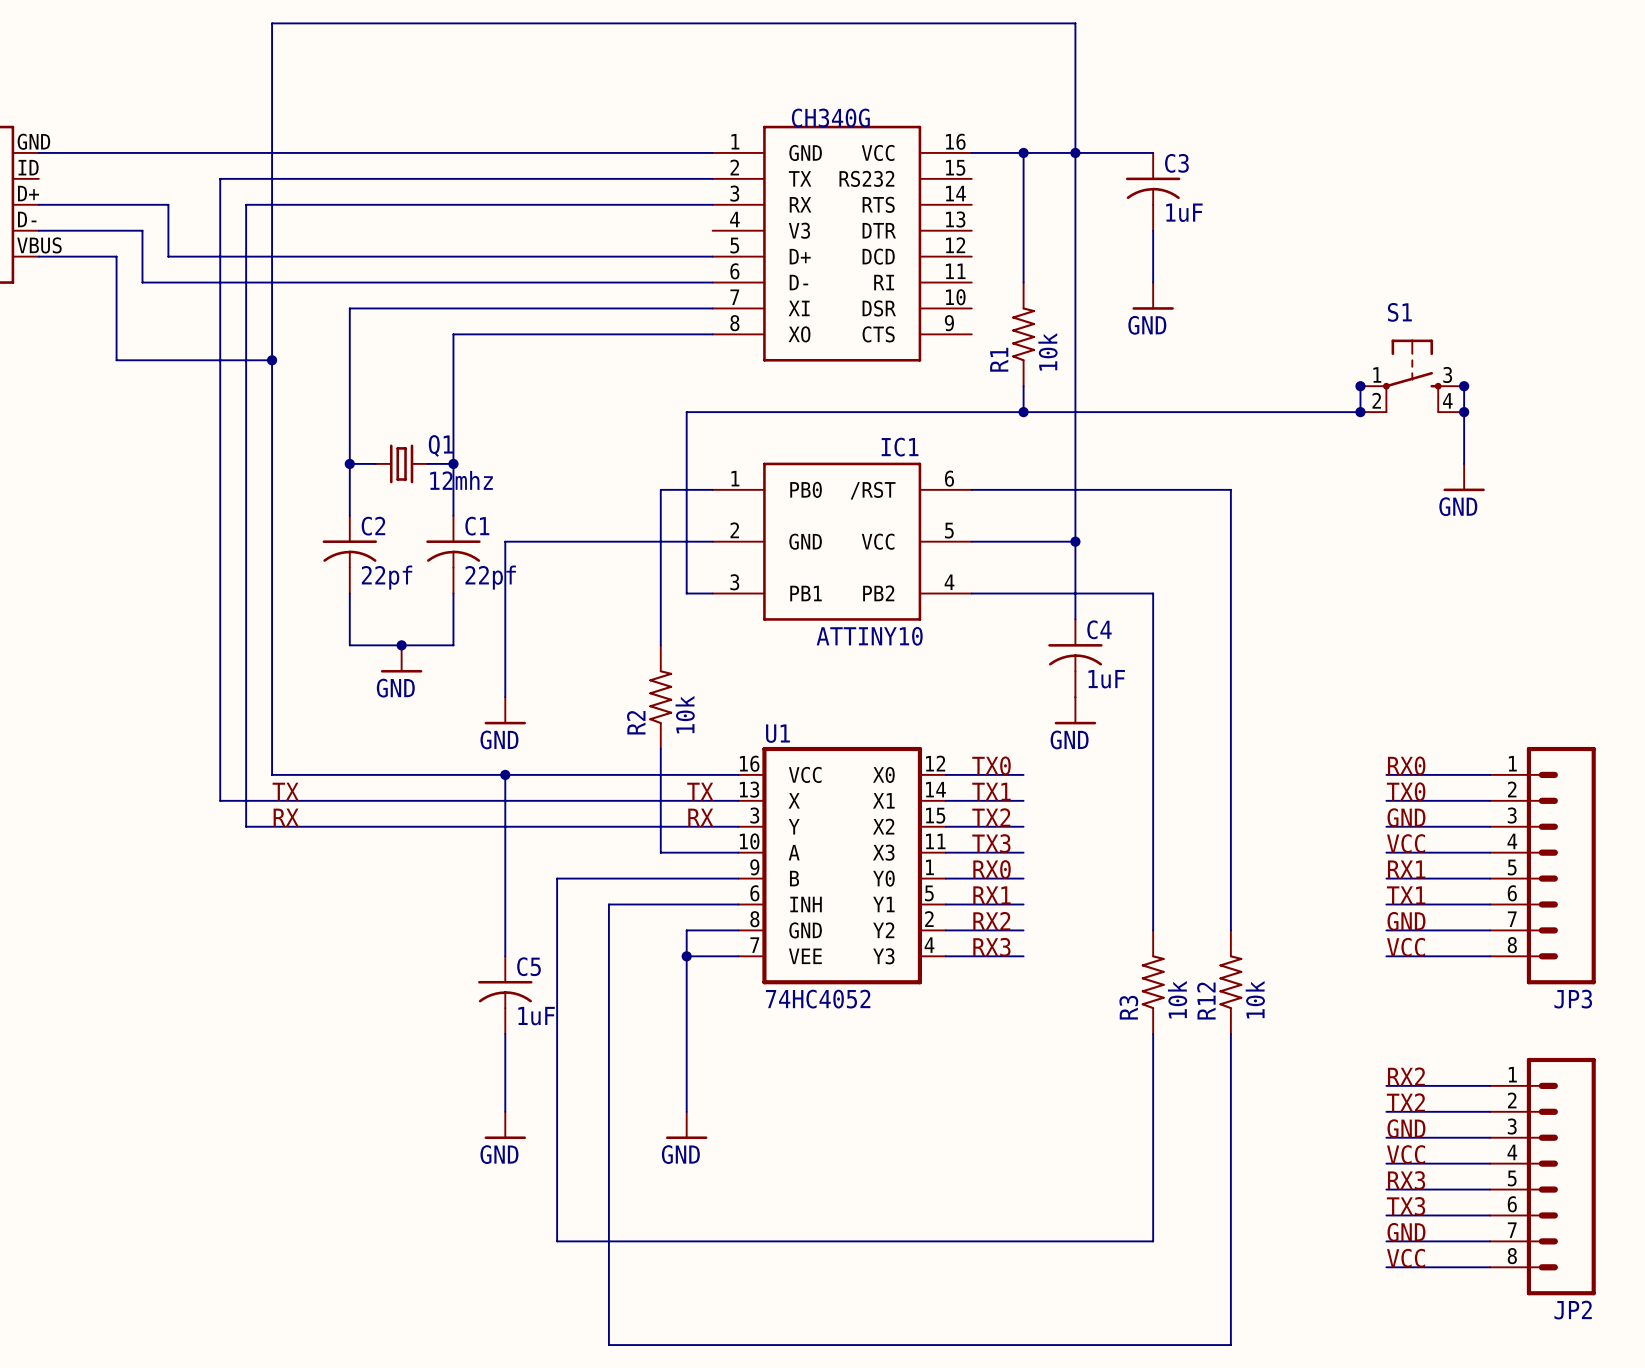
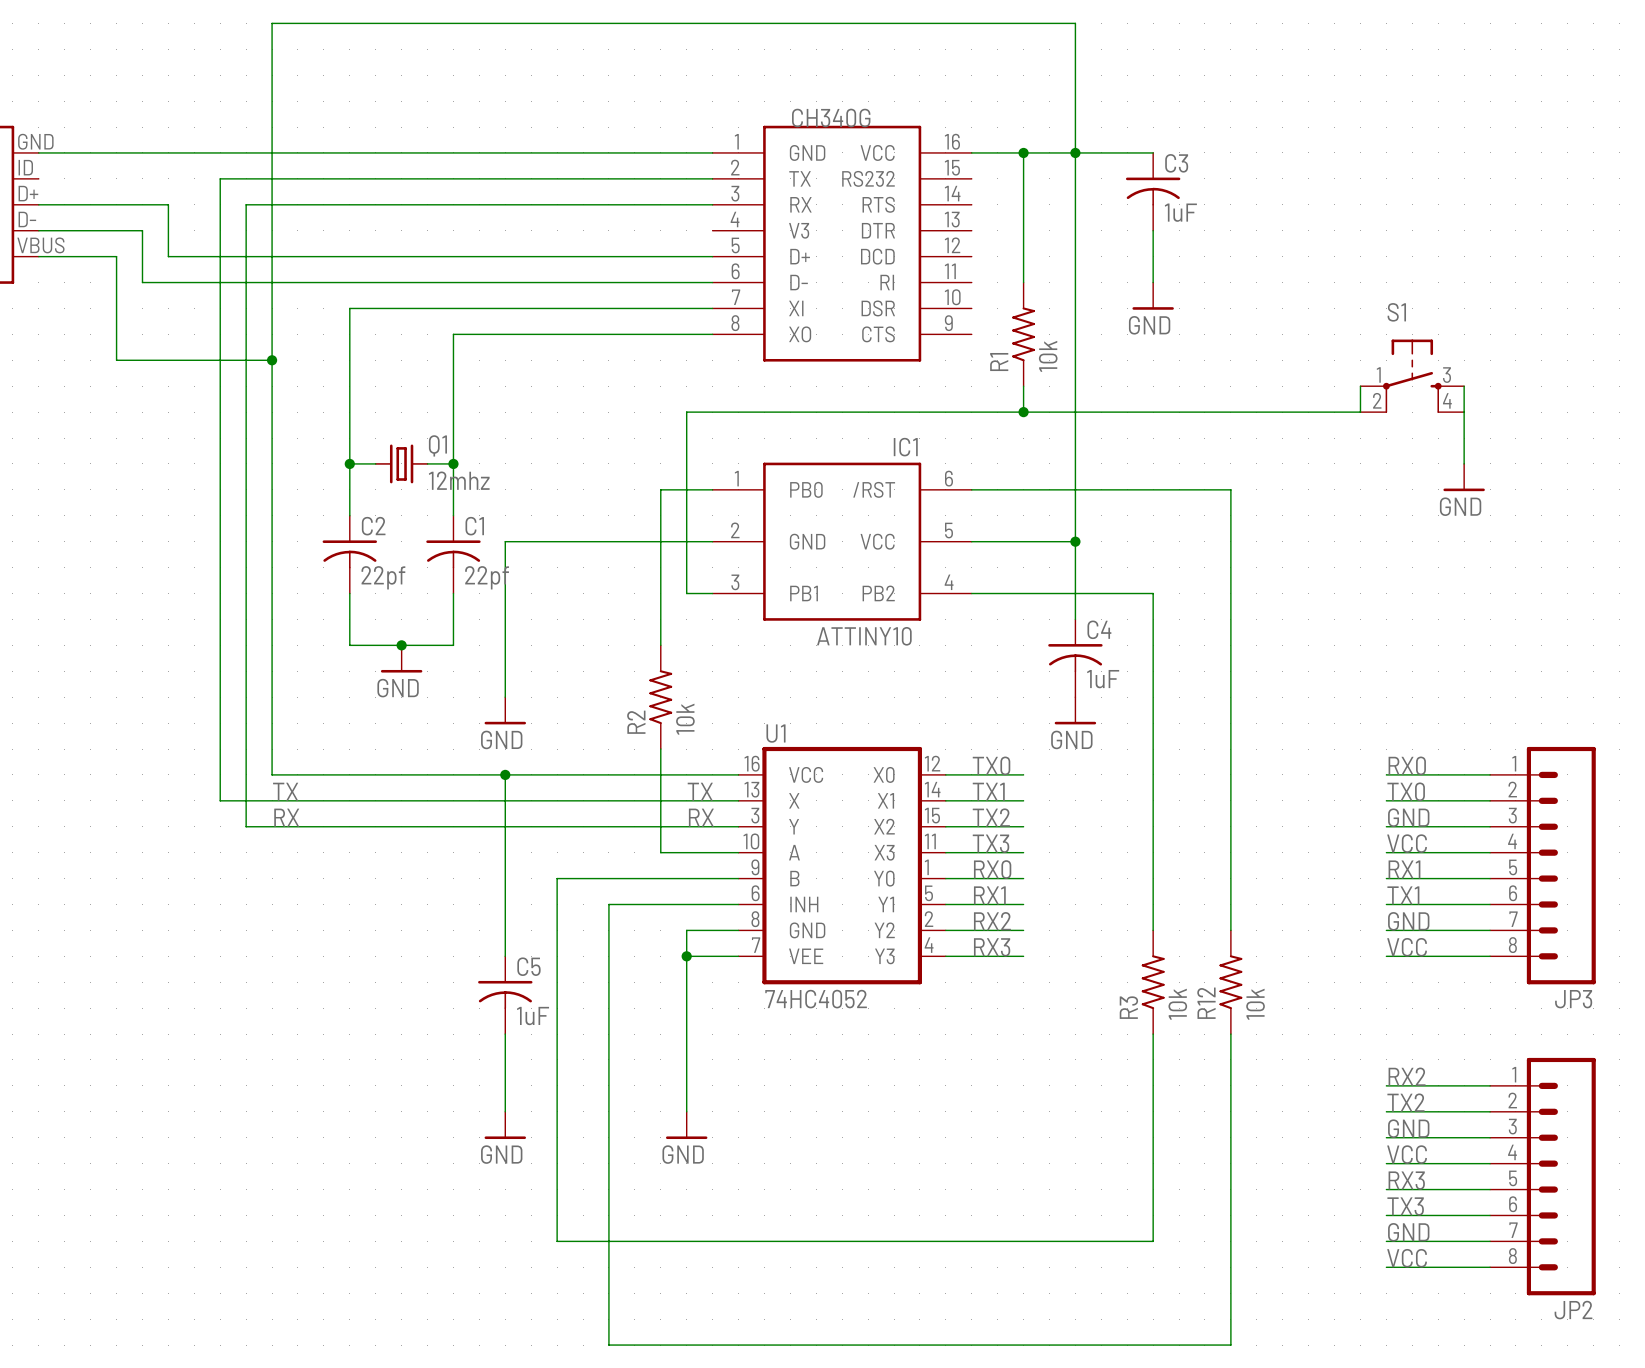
junction: (1360, 386) -> none
junction: (1464, 386) -> none
junction: (1360, 412) -> none
junction: (1464, 412) -> none

